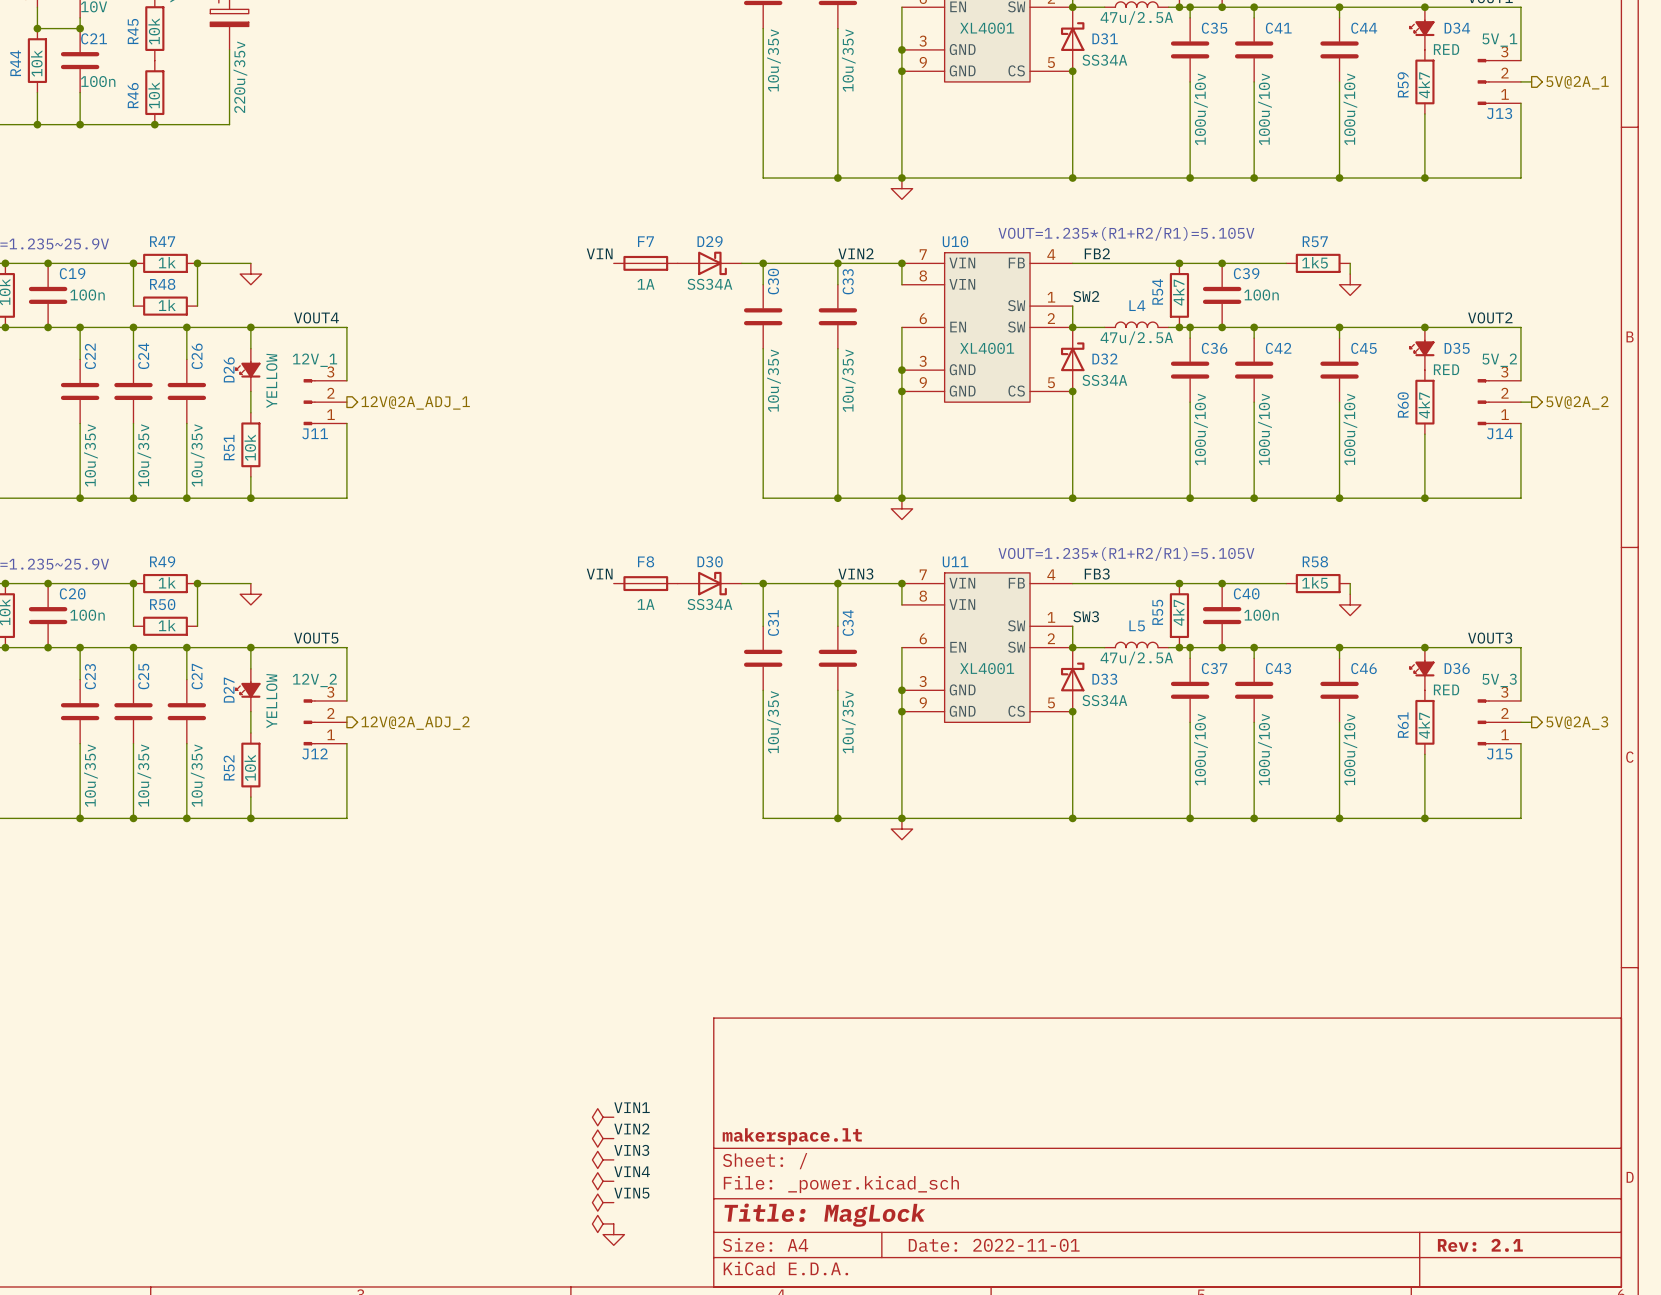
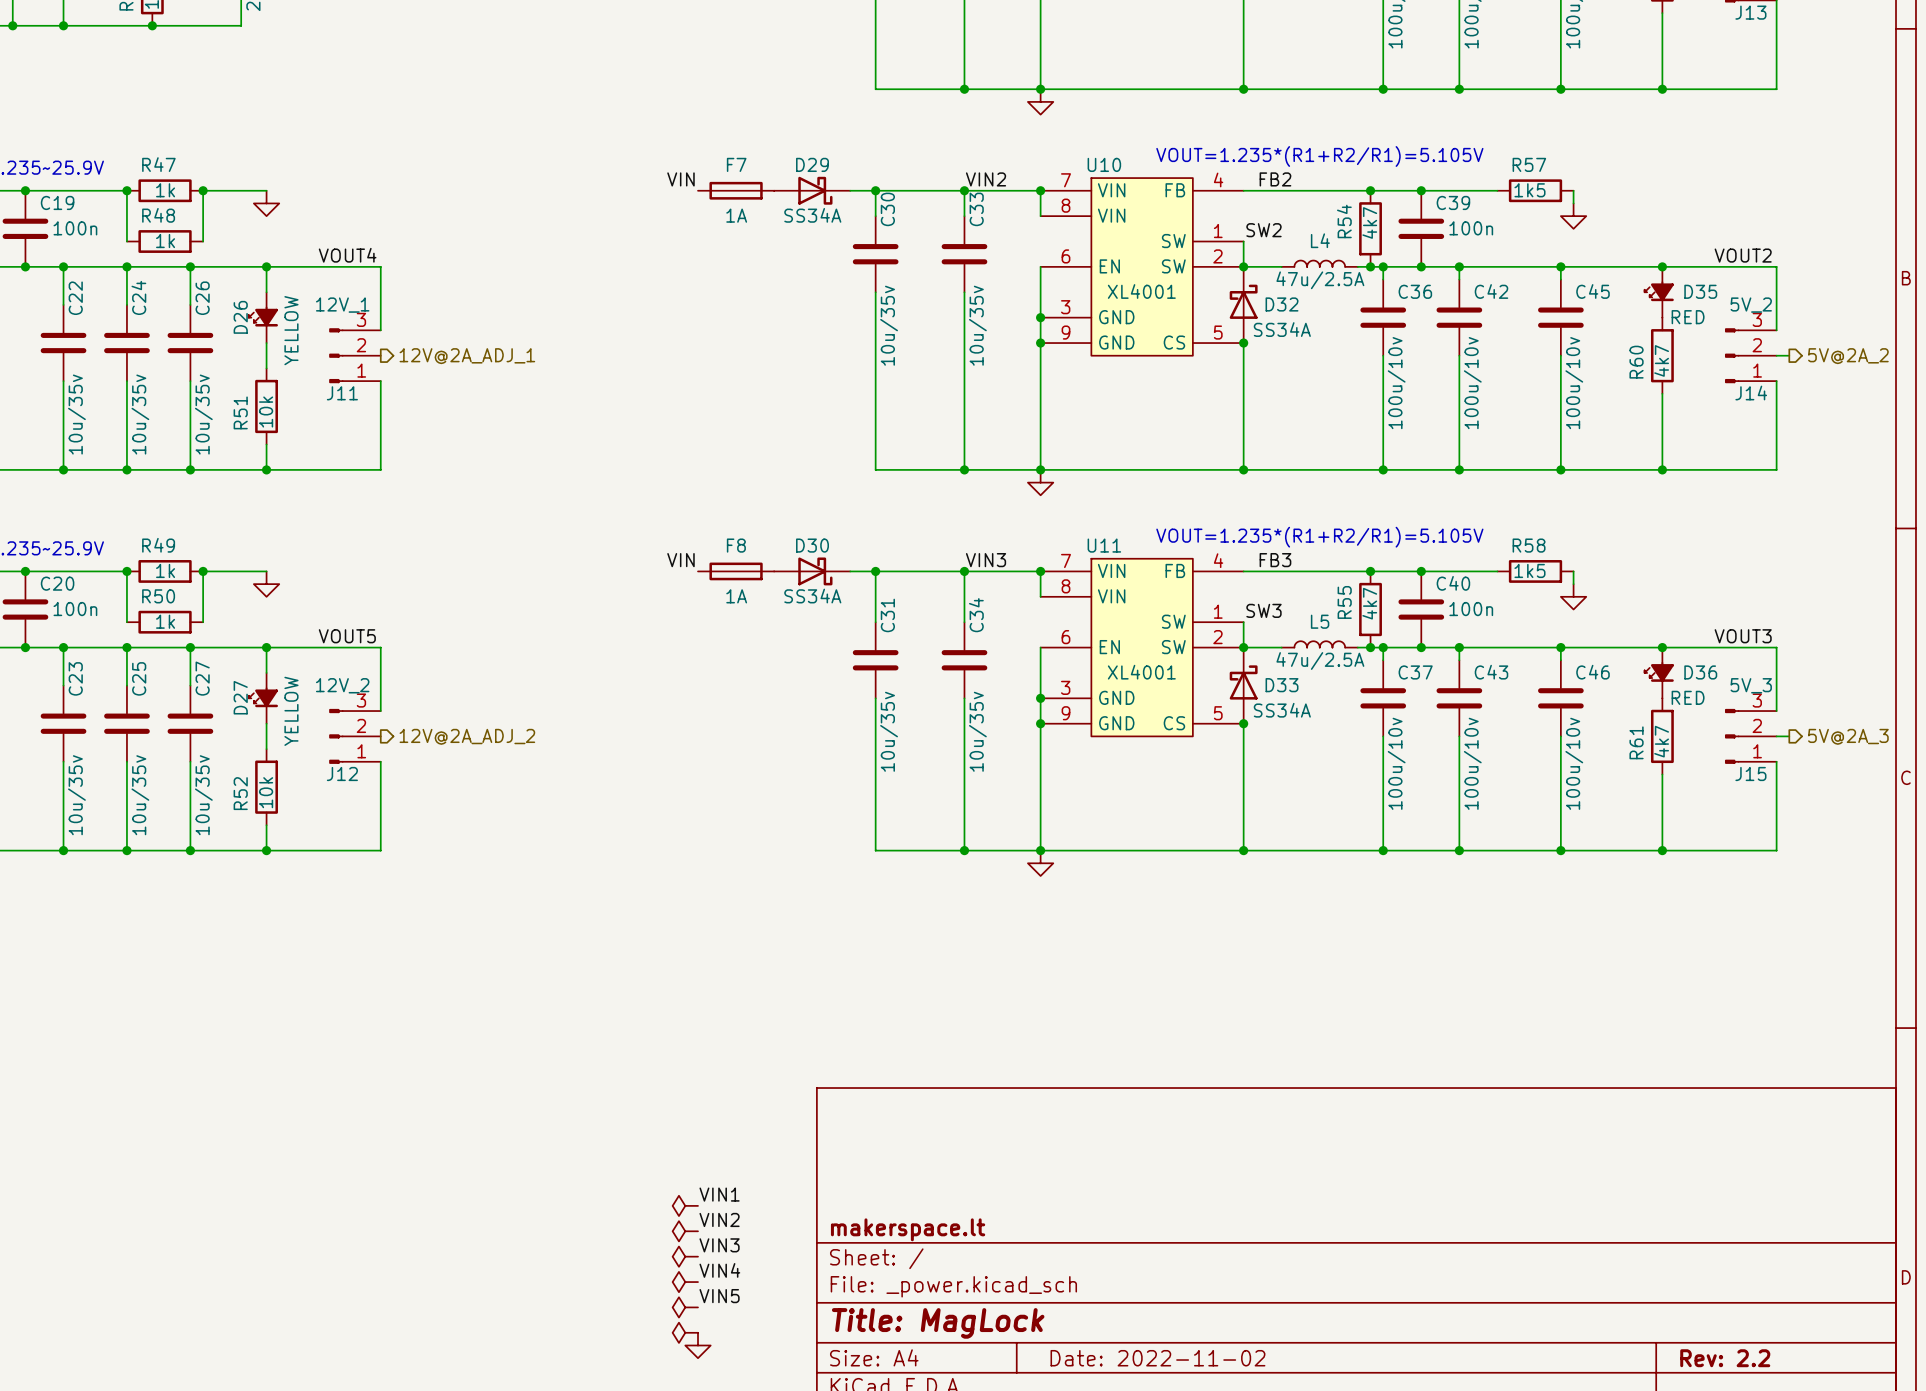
title block: Date: 2022-11-01 (994, 1245) -> Date: 2022-11-02 (1157, 1358)
title block: Rev: 2.1 (1480, 1245) -> Rev: 2.2 (1725, 1358)

